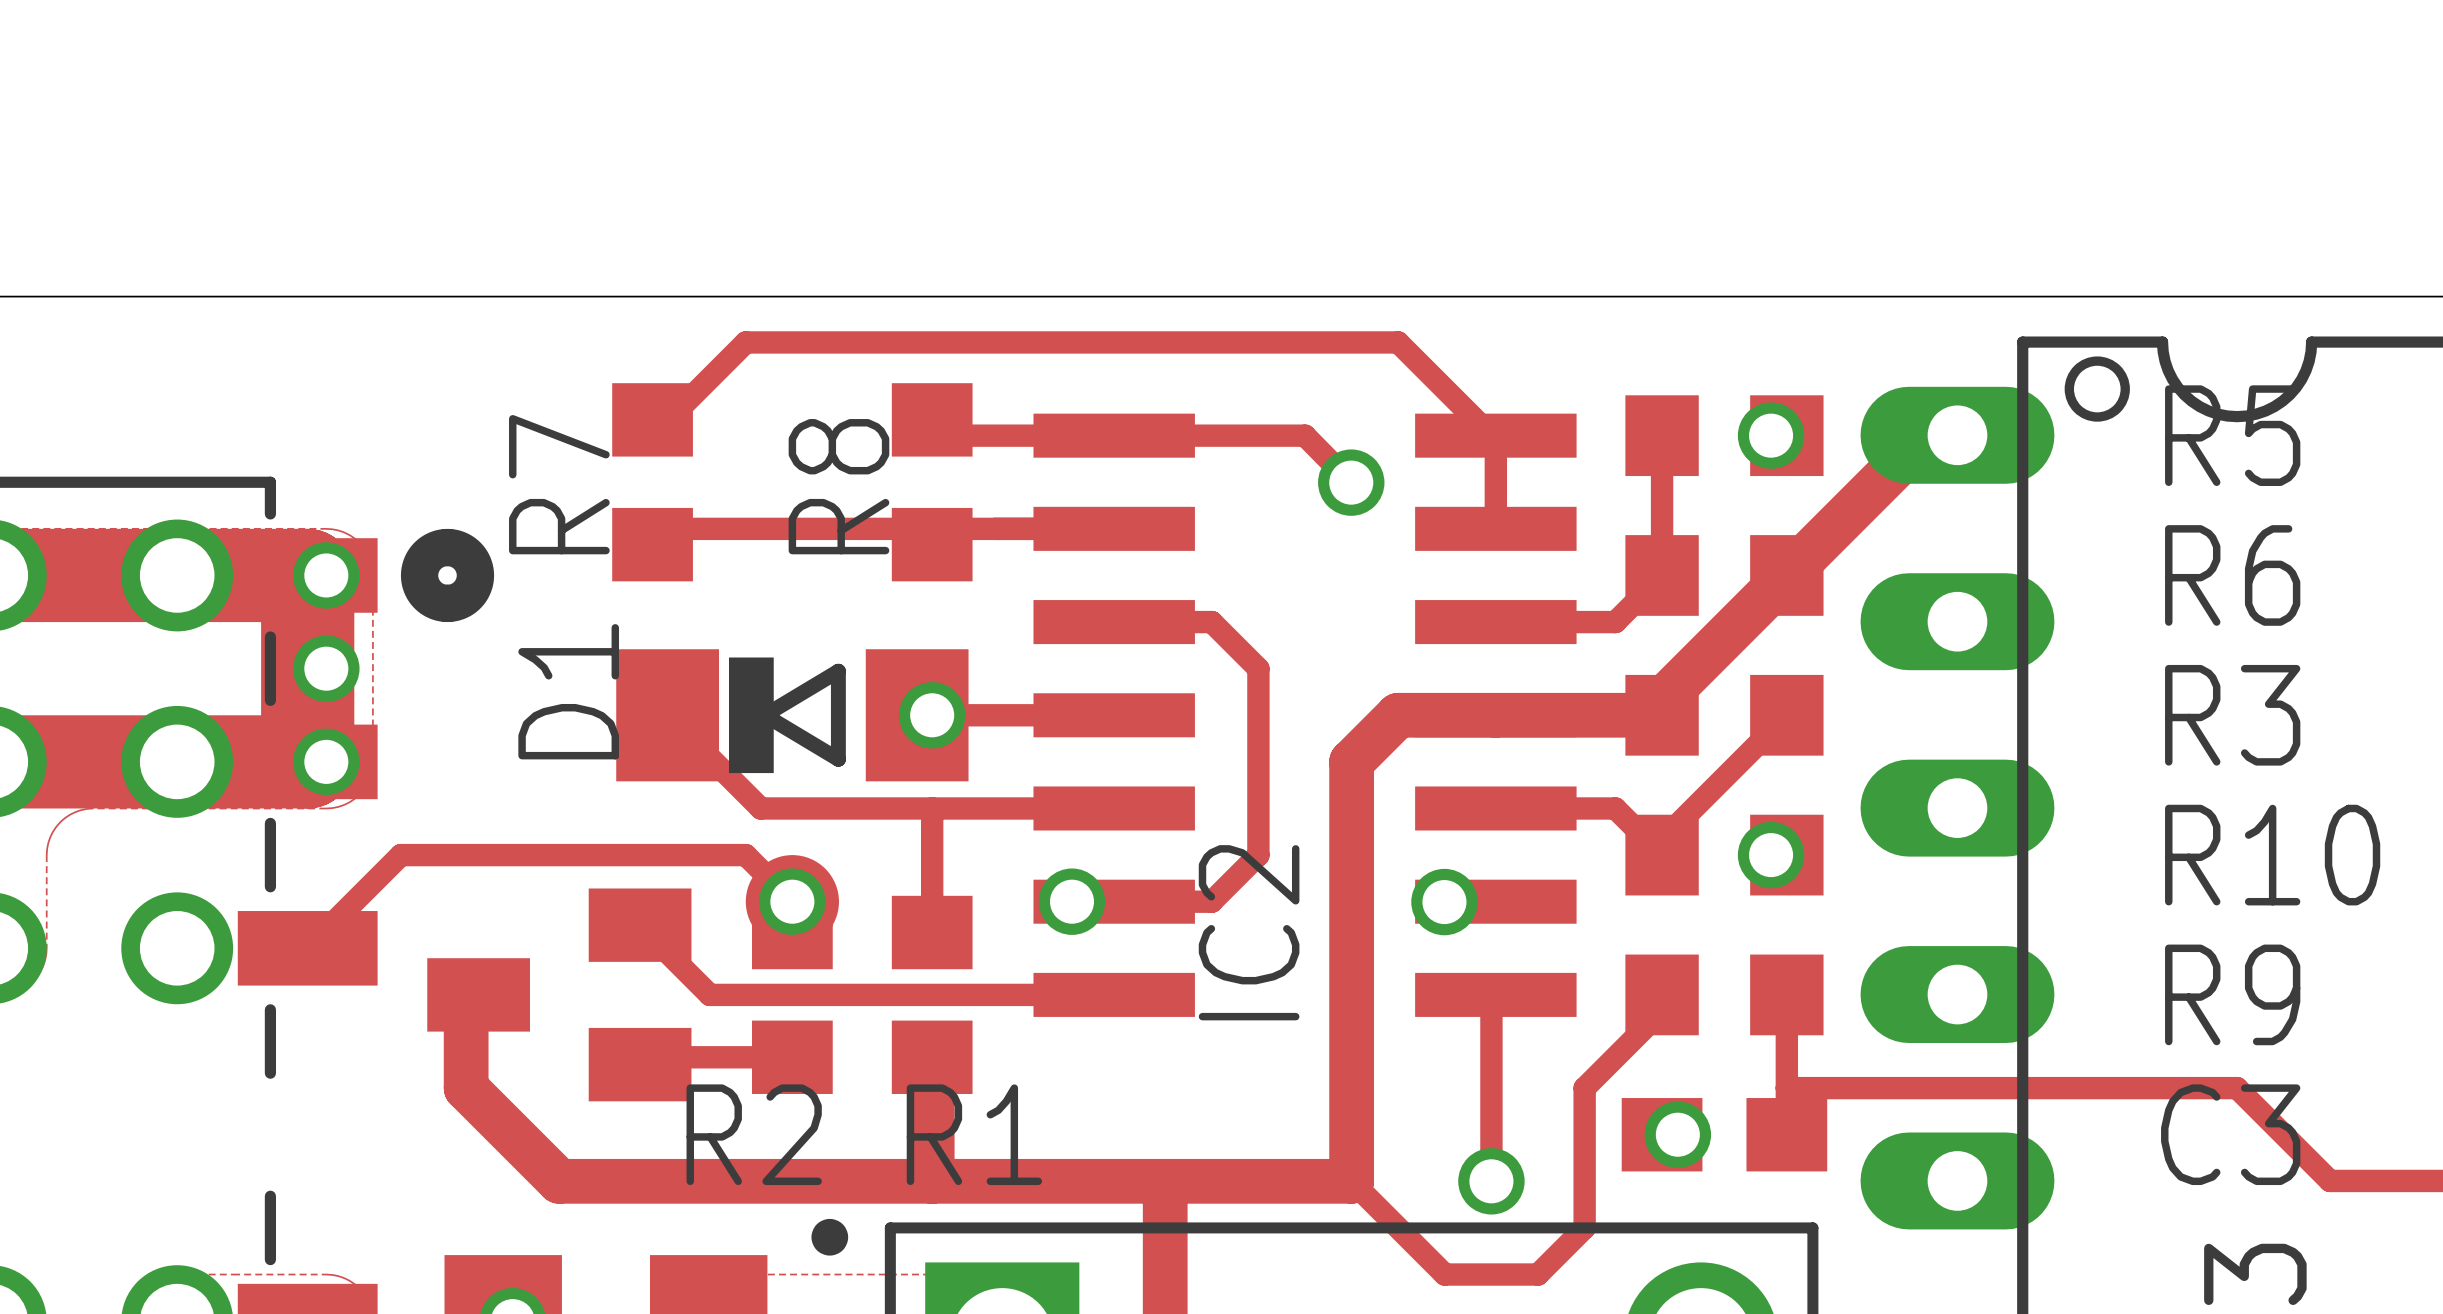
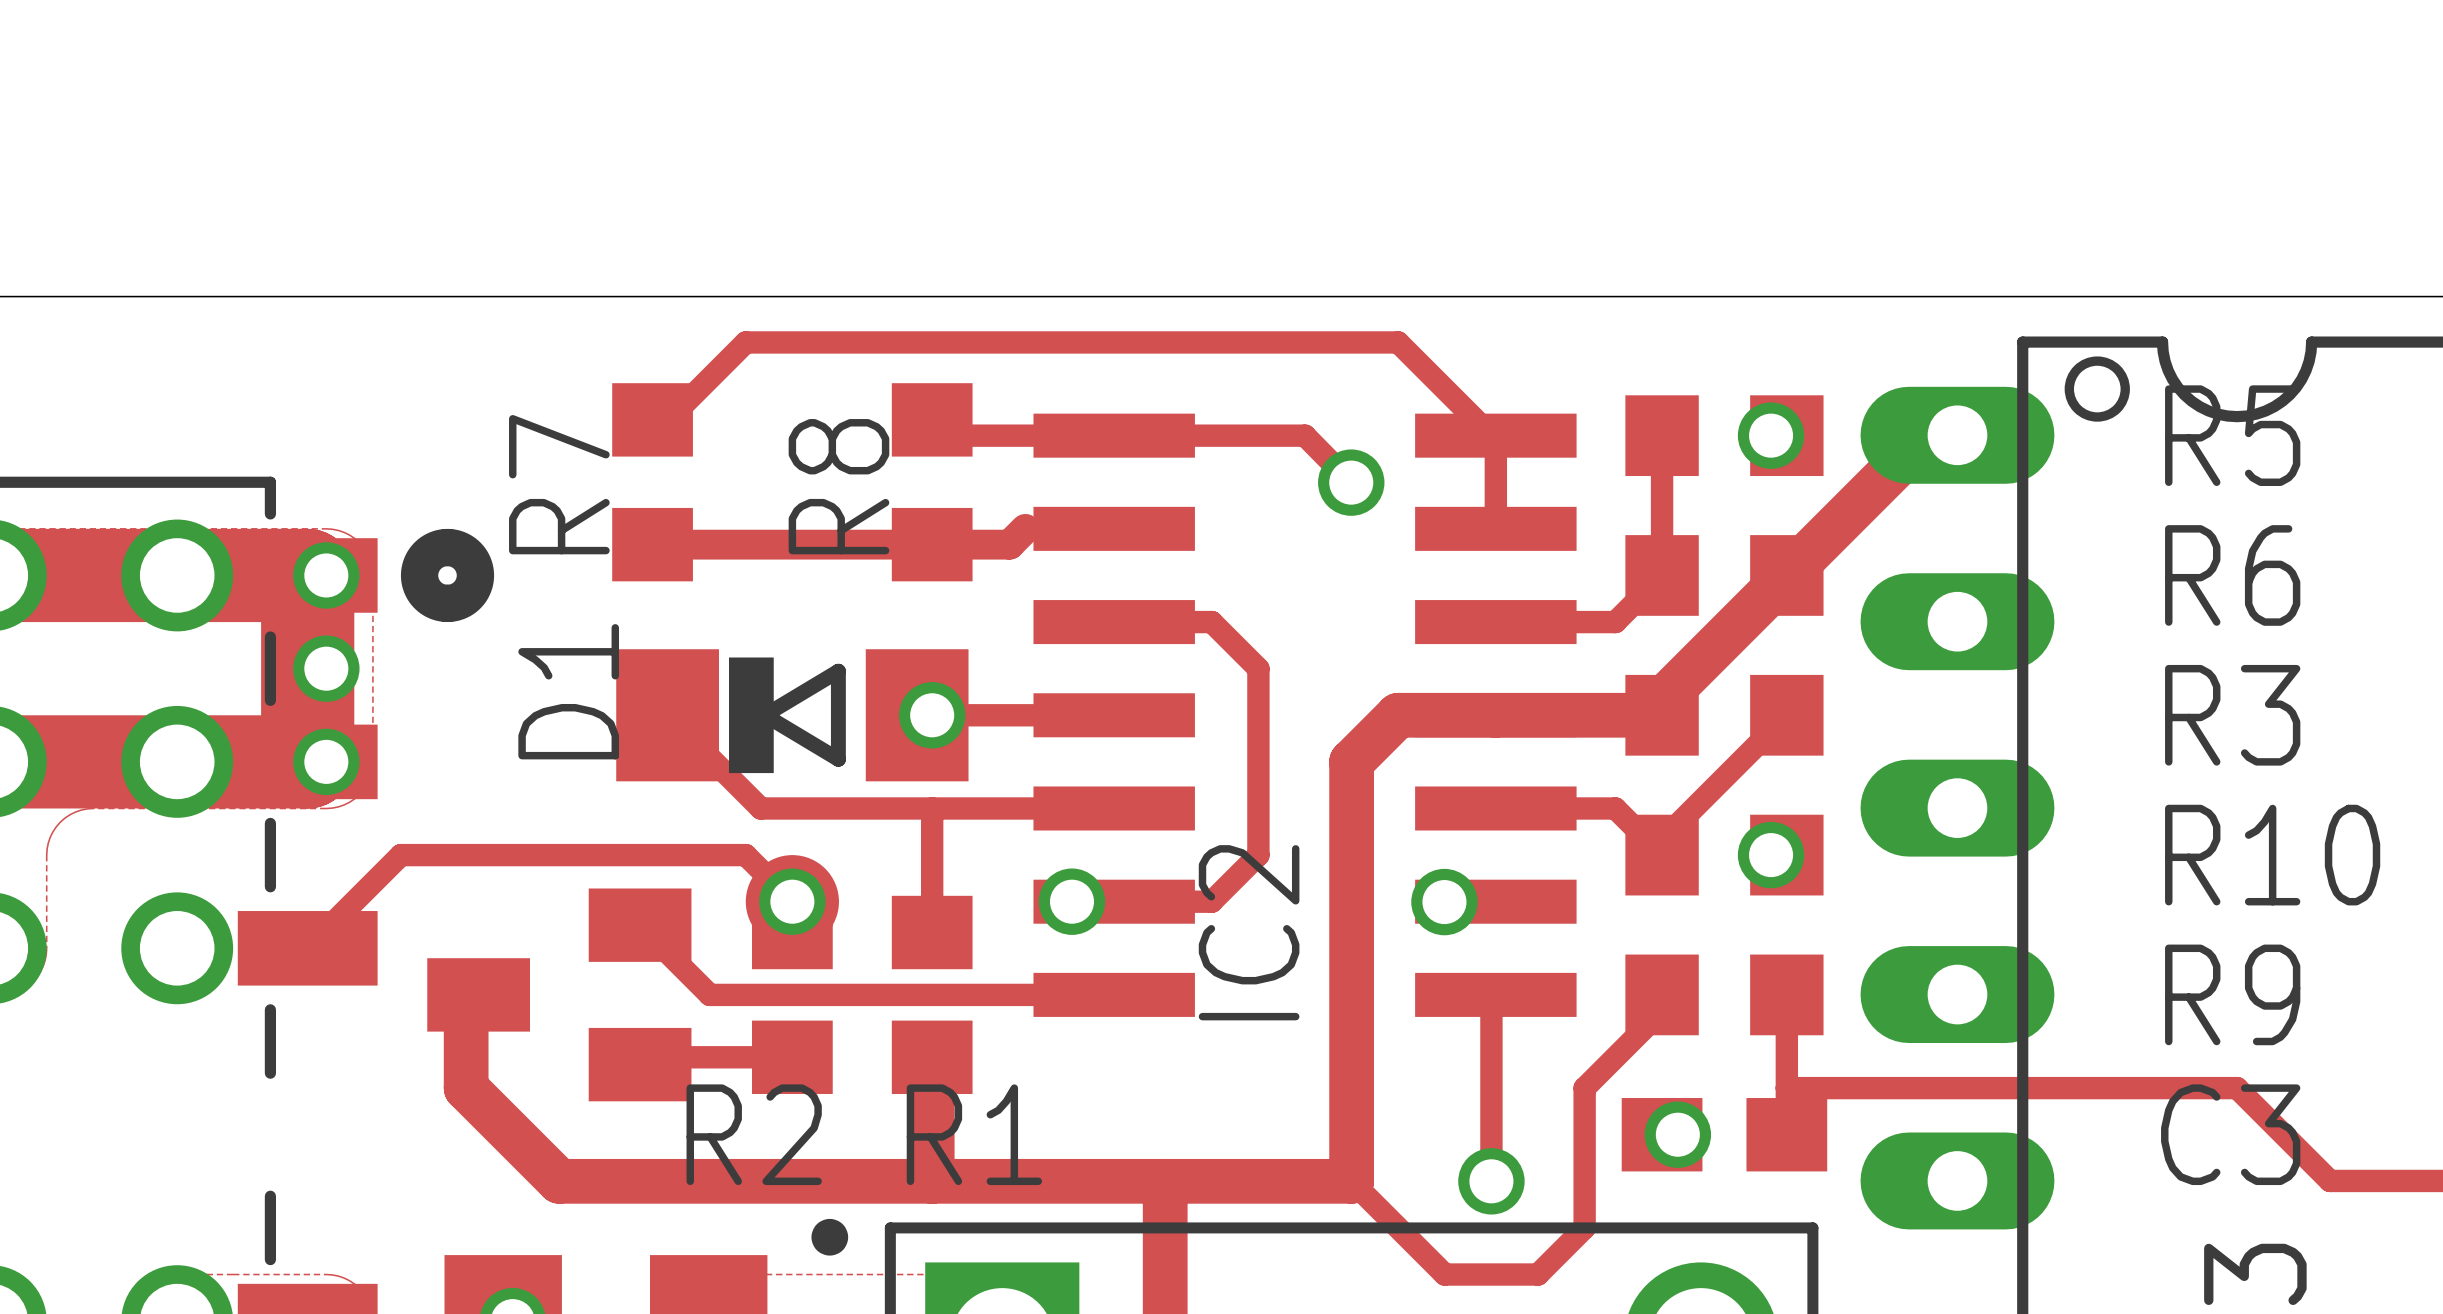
track: (1025, 528) (668, 528) (652, 544) -> (1025, 528) (1009, 544) (652, 544)

